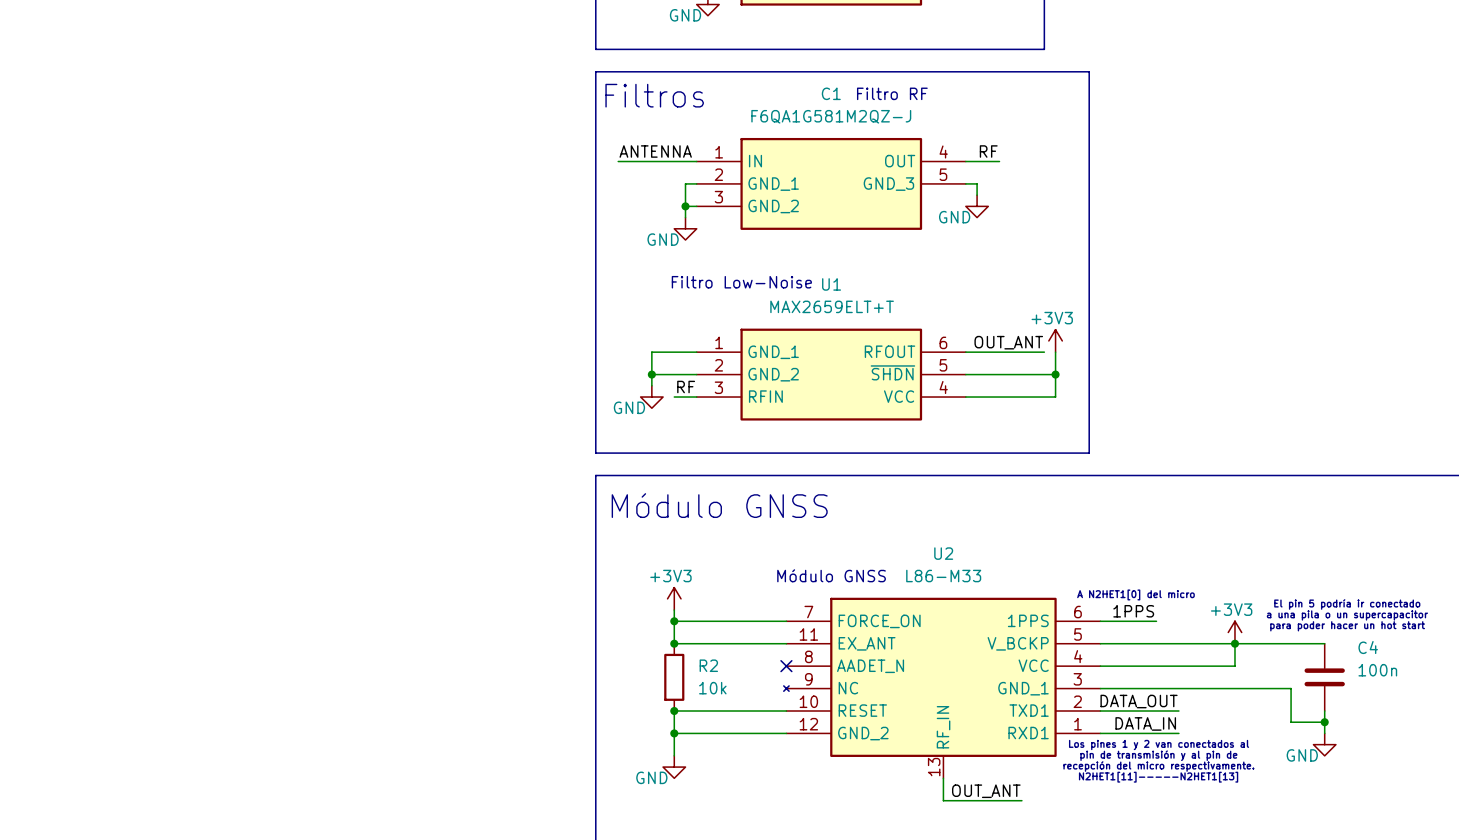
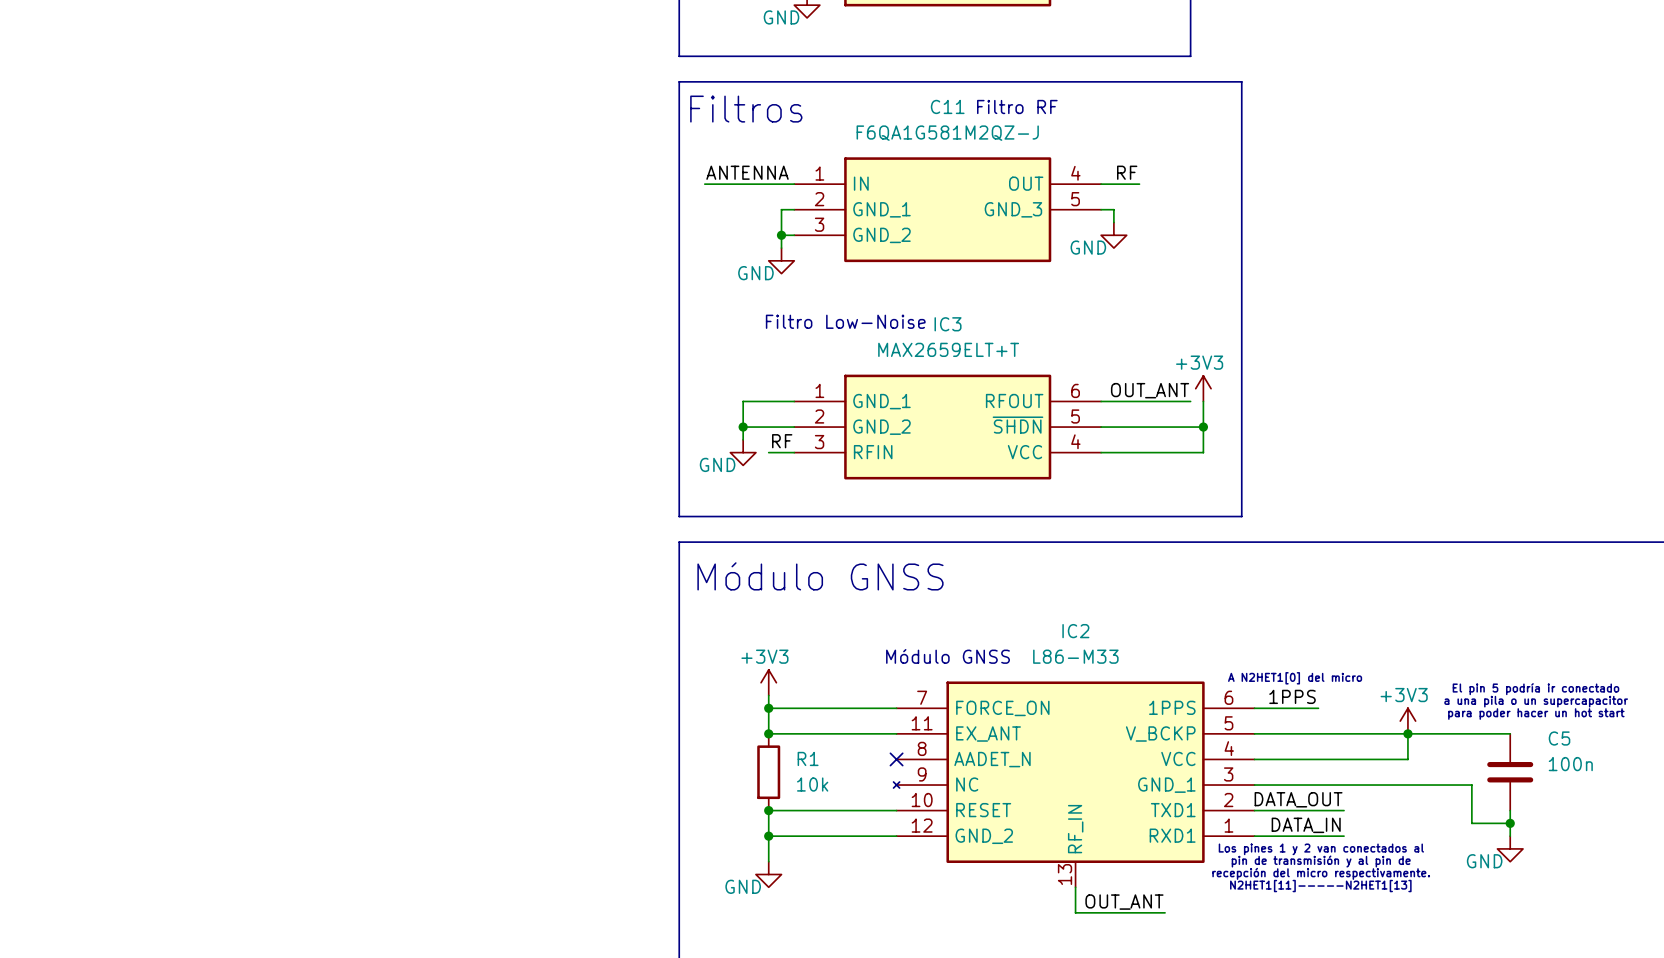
C1 name: C1 (831, 93) -> C11 (947, 106)
U1 name: U1 (831, 284) -> IC3 (948, 324)
U2 name: U2 (943, 553) -> IC2 (1075, 631)
C4 name: C4 (1368, 647) -> C5 (1559, 738)
R2 name: R2 (708, 665) -> R1 (808, 758)

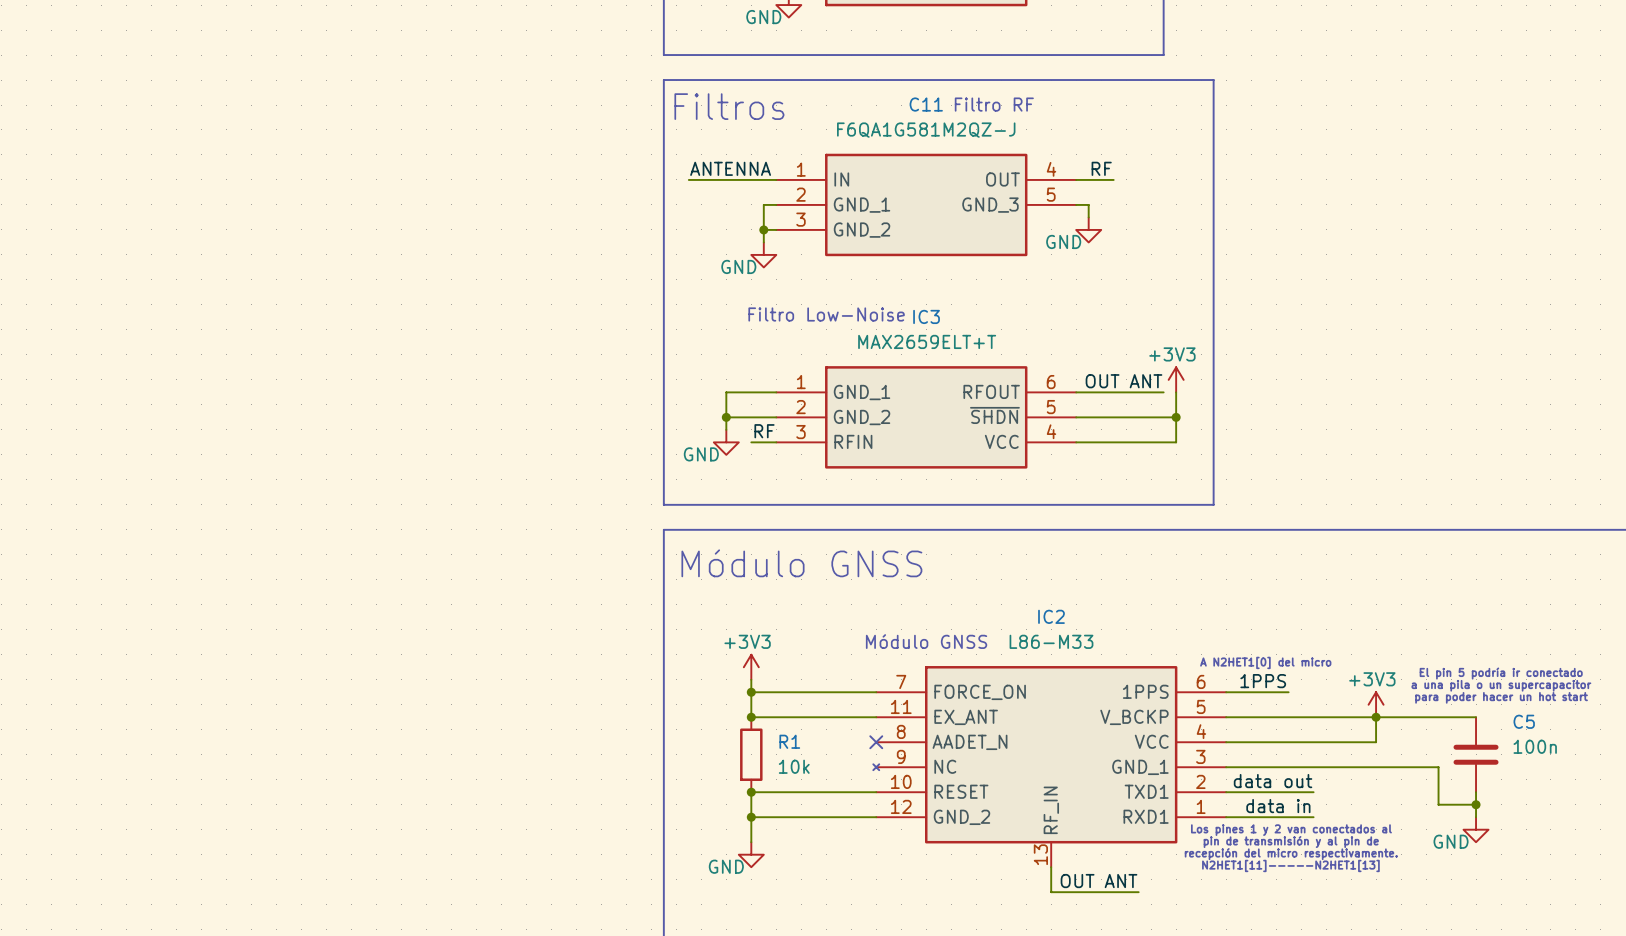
label: OUT_ANT (1150, 390) -> OUT ANT (1123, 381)
label: DATA_OUT (1298, 799) -> data out (1273, 781)
label: DATA_IN (1306, 825) -> data in (1278, 806)
label: OUT_ANT (1124, 902) -> OUT ANT (1099, 881)

